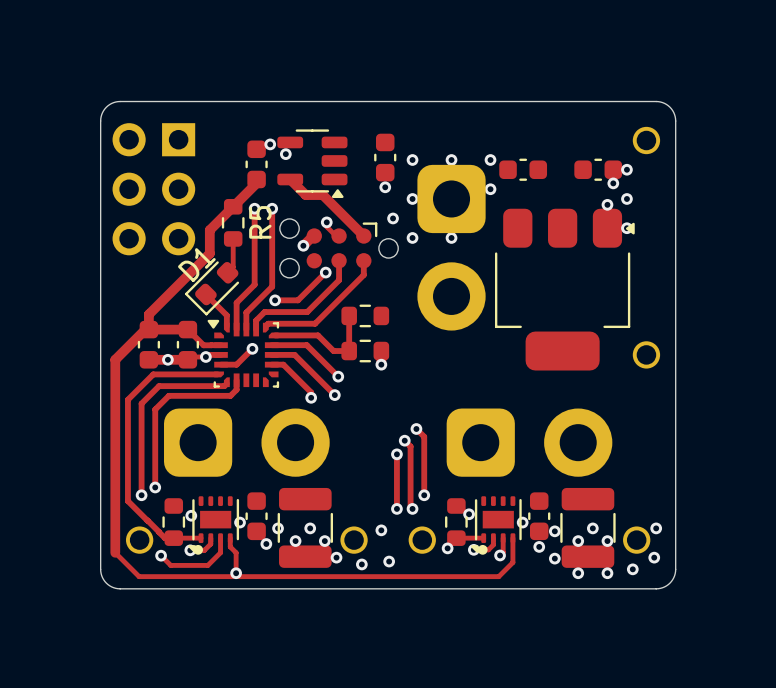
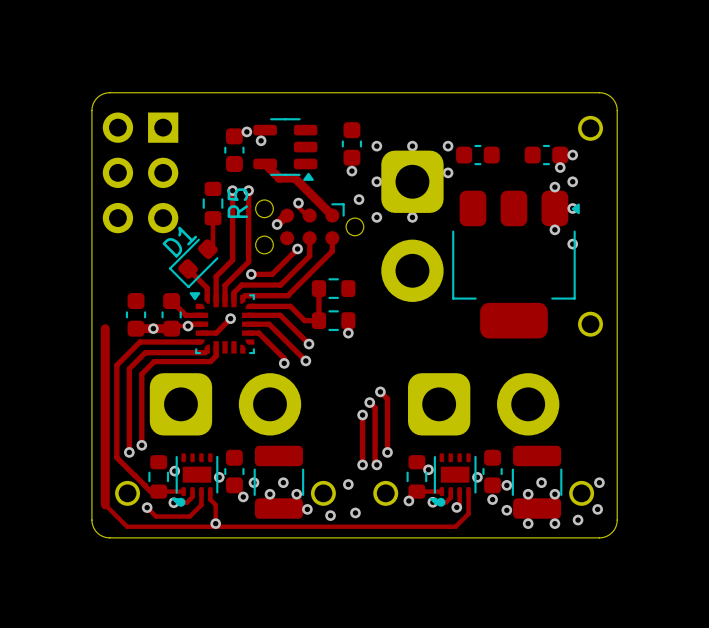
track: (256, 183) (209, 230) (209, 253) (148, 314) (148, 329) (187, 329) -> none
via: none -> (554, 229)
via: none -> (572, 244)
track: (145, 329) (115, 359) -> none

